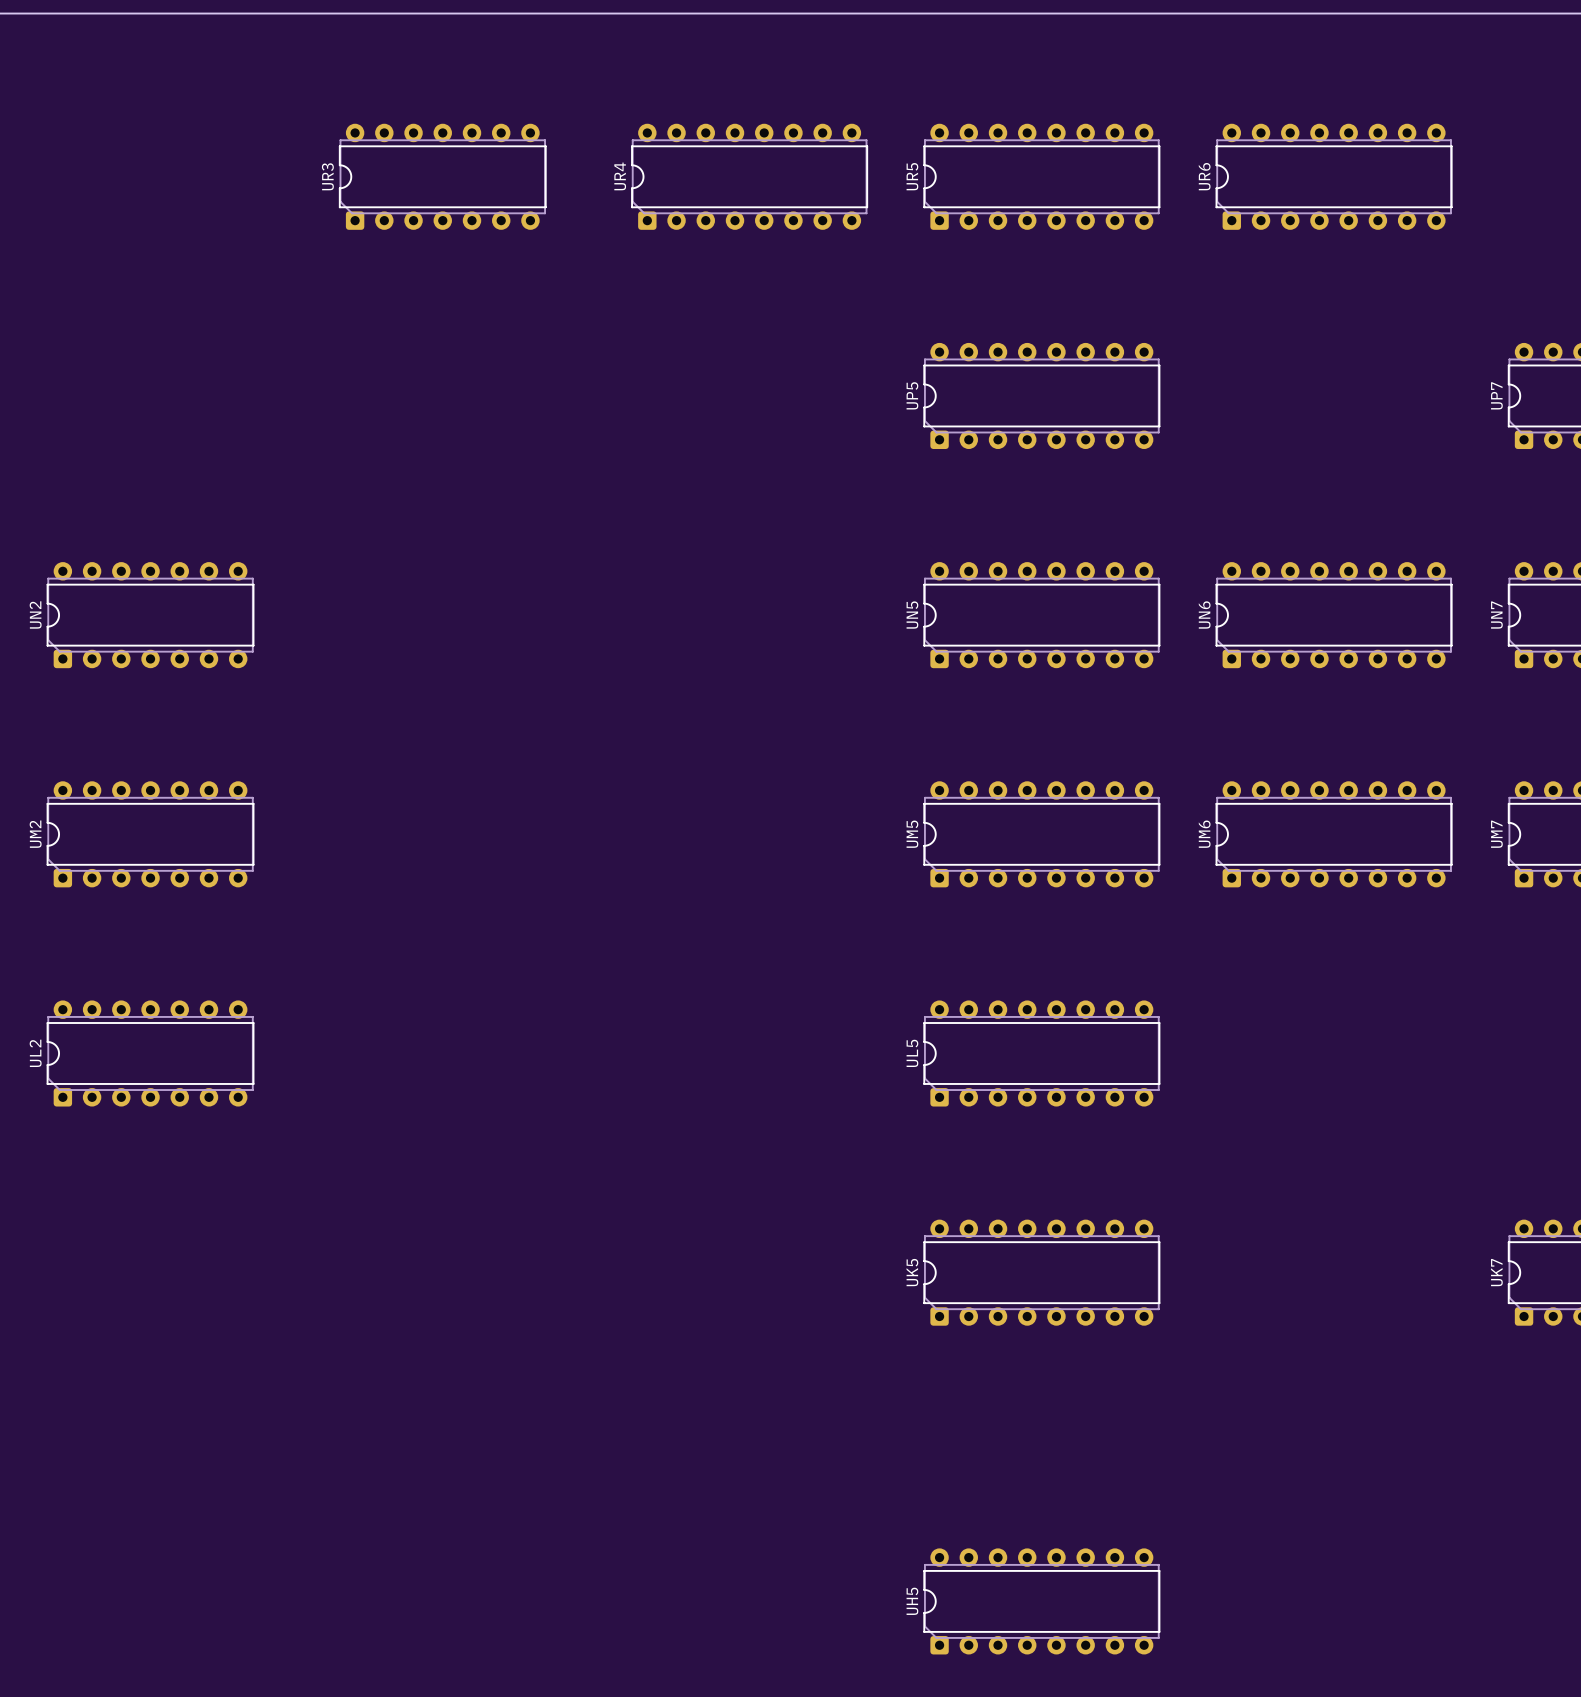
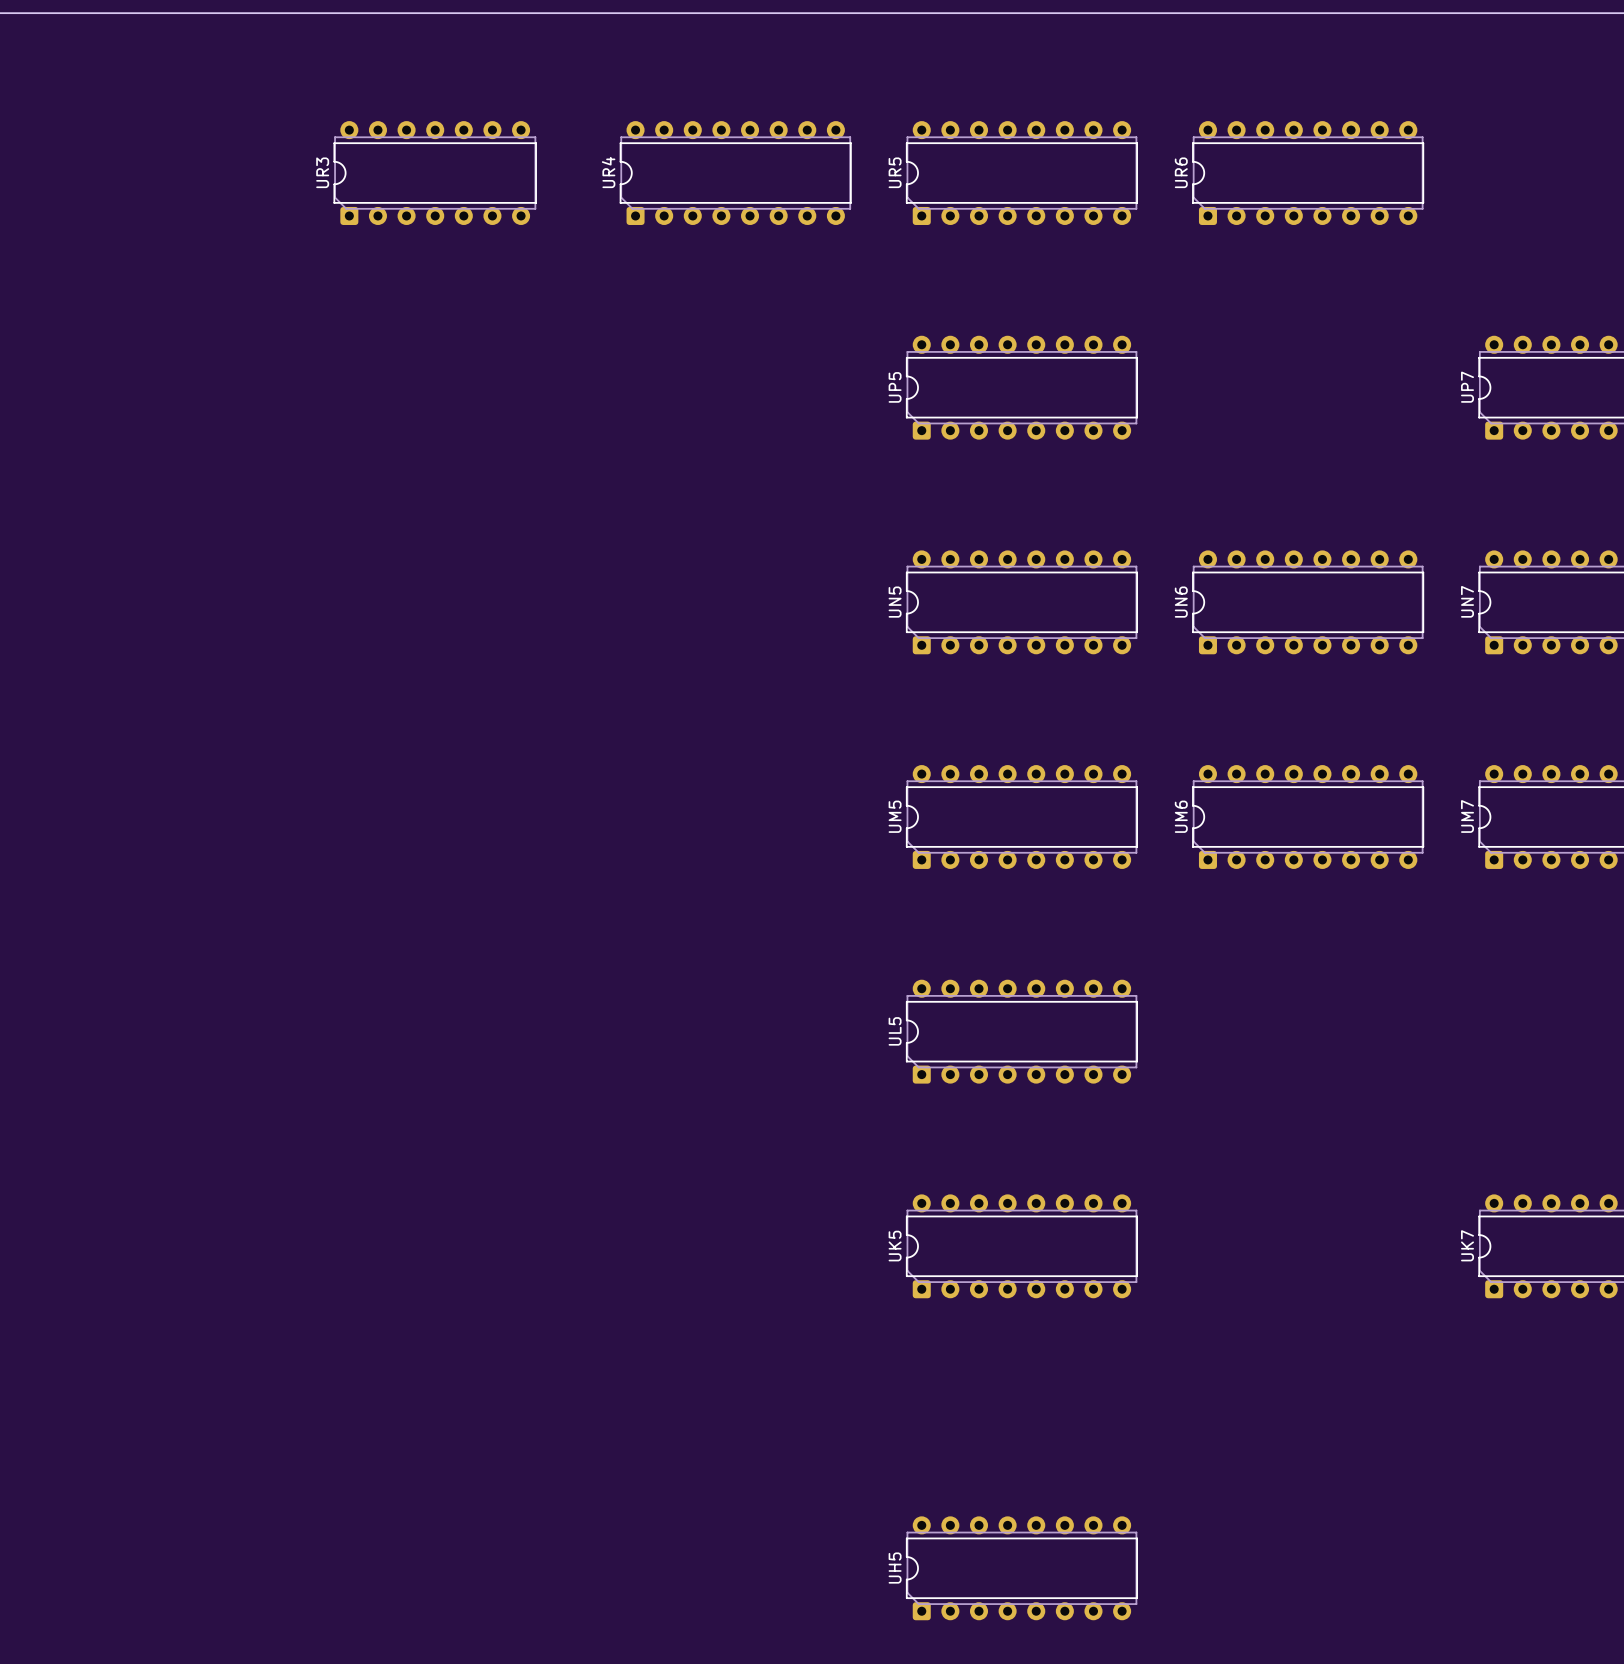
UN2: (150, 615) -> none
UM2: (150, 834) -> none
UL2: (150, 1053) -> none

